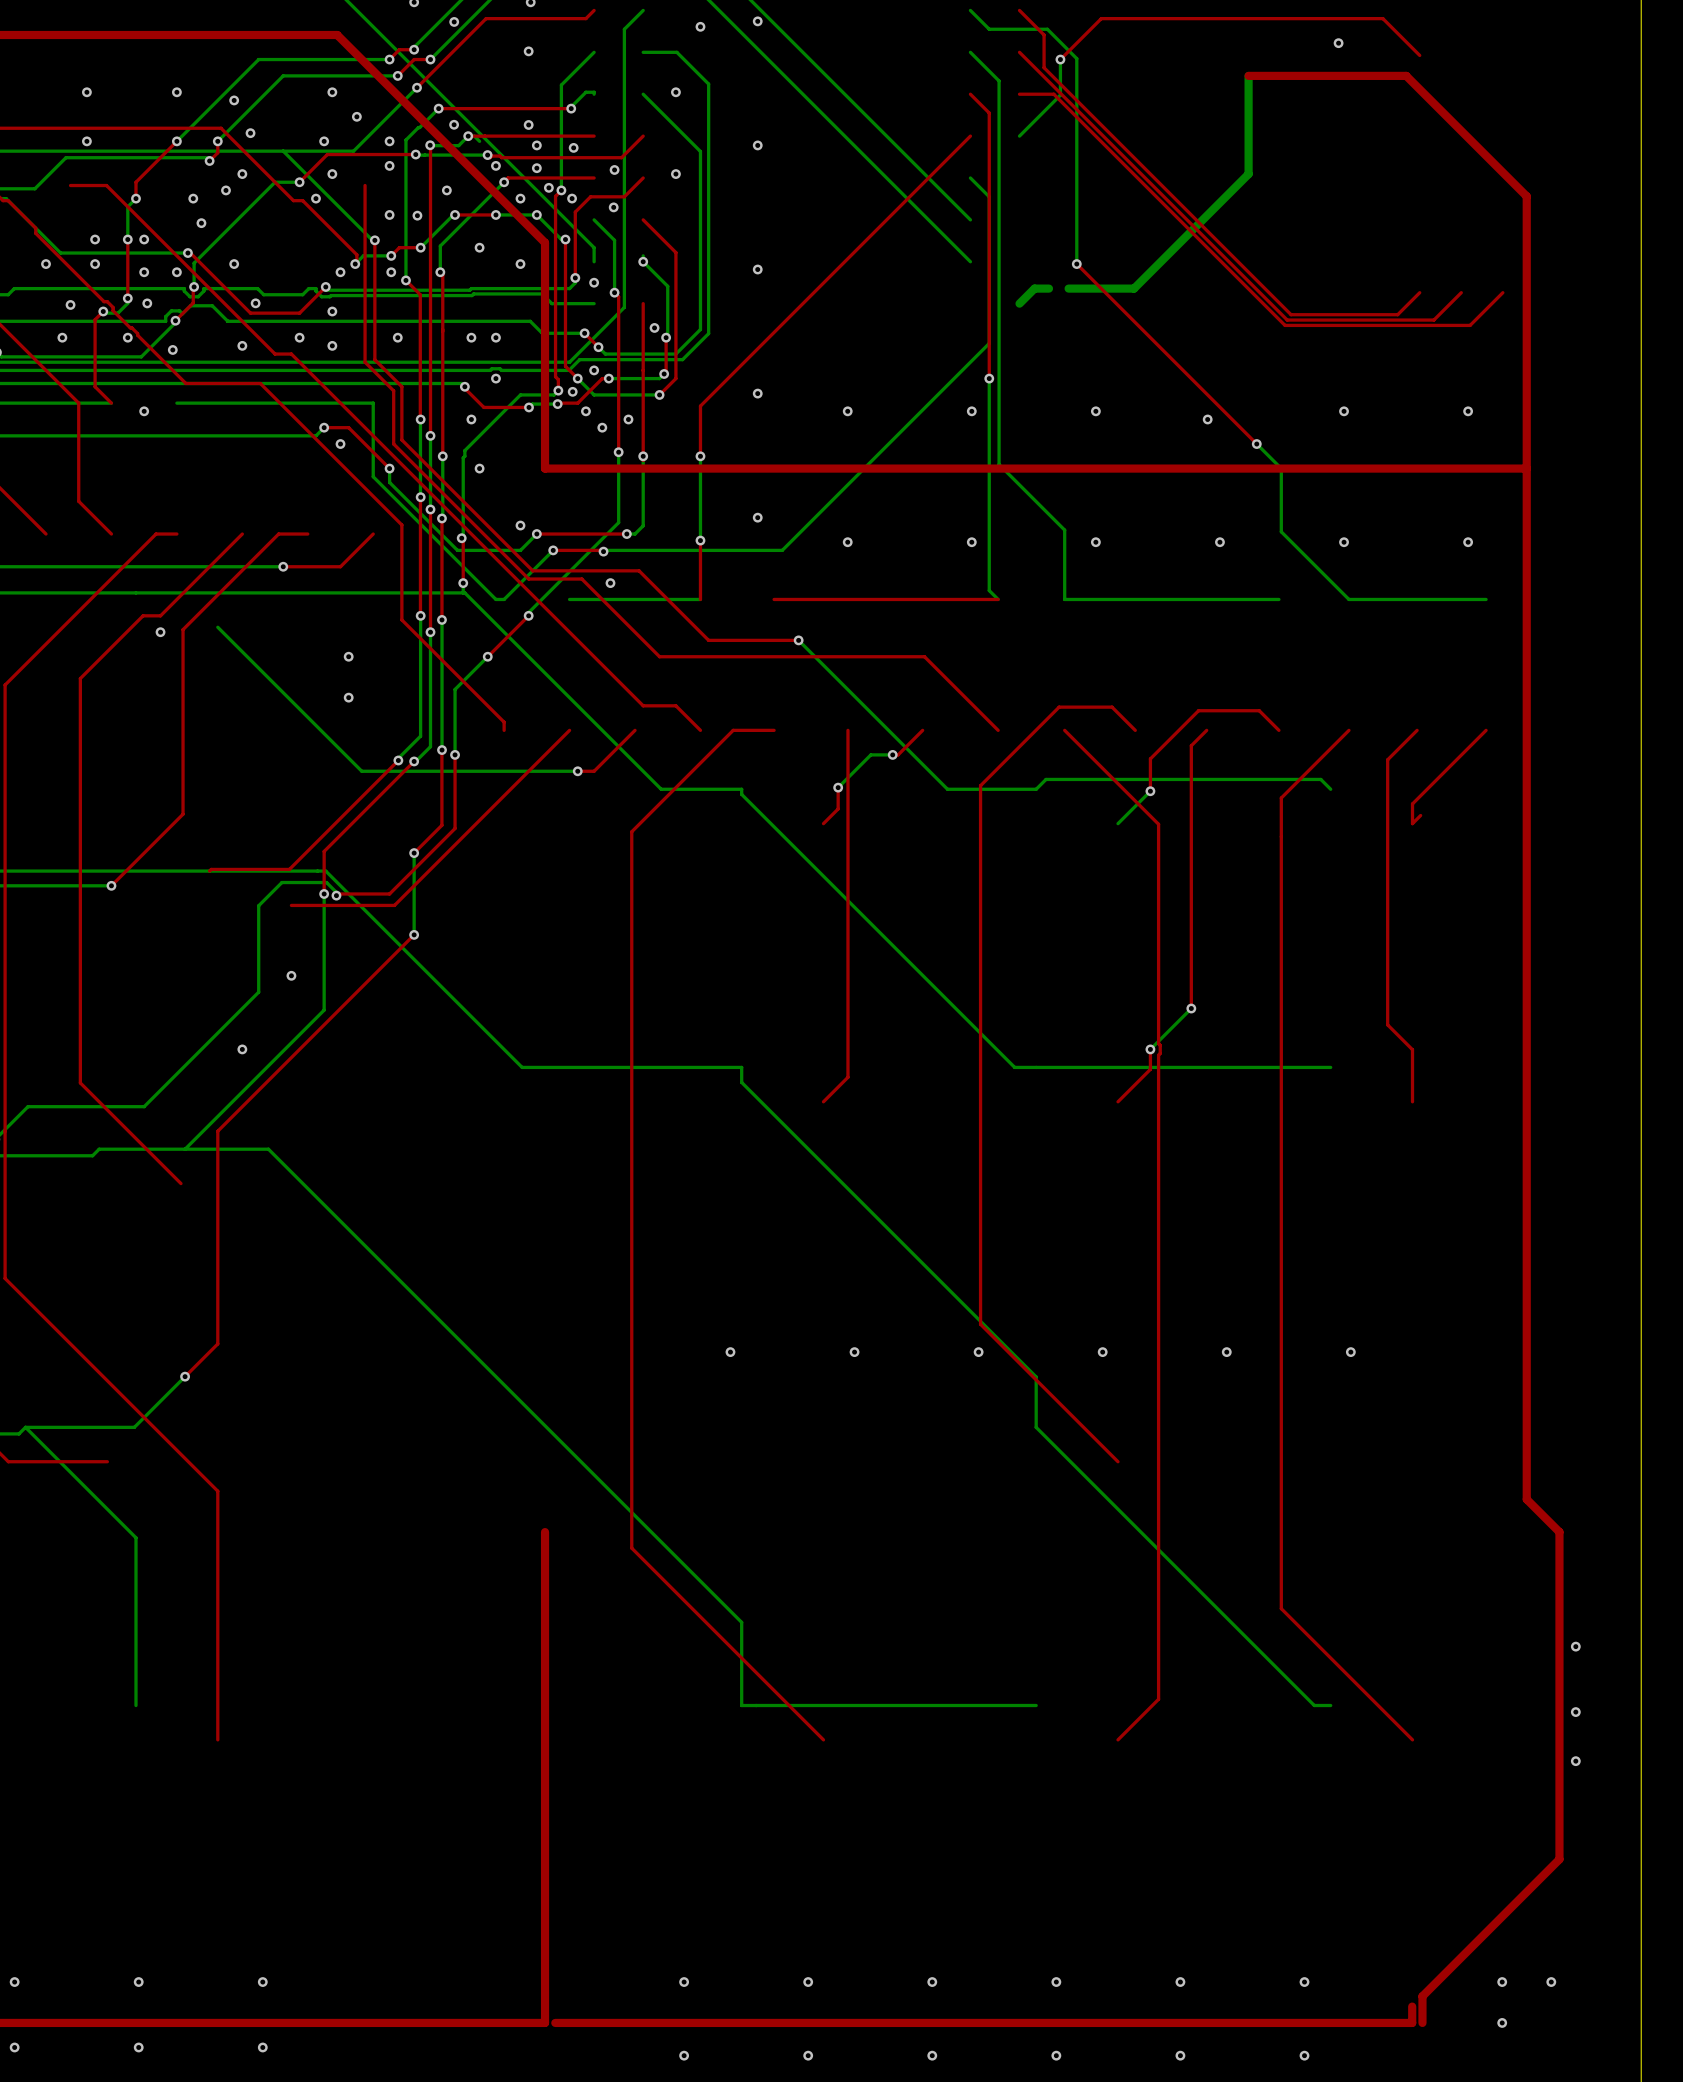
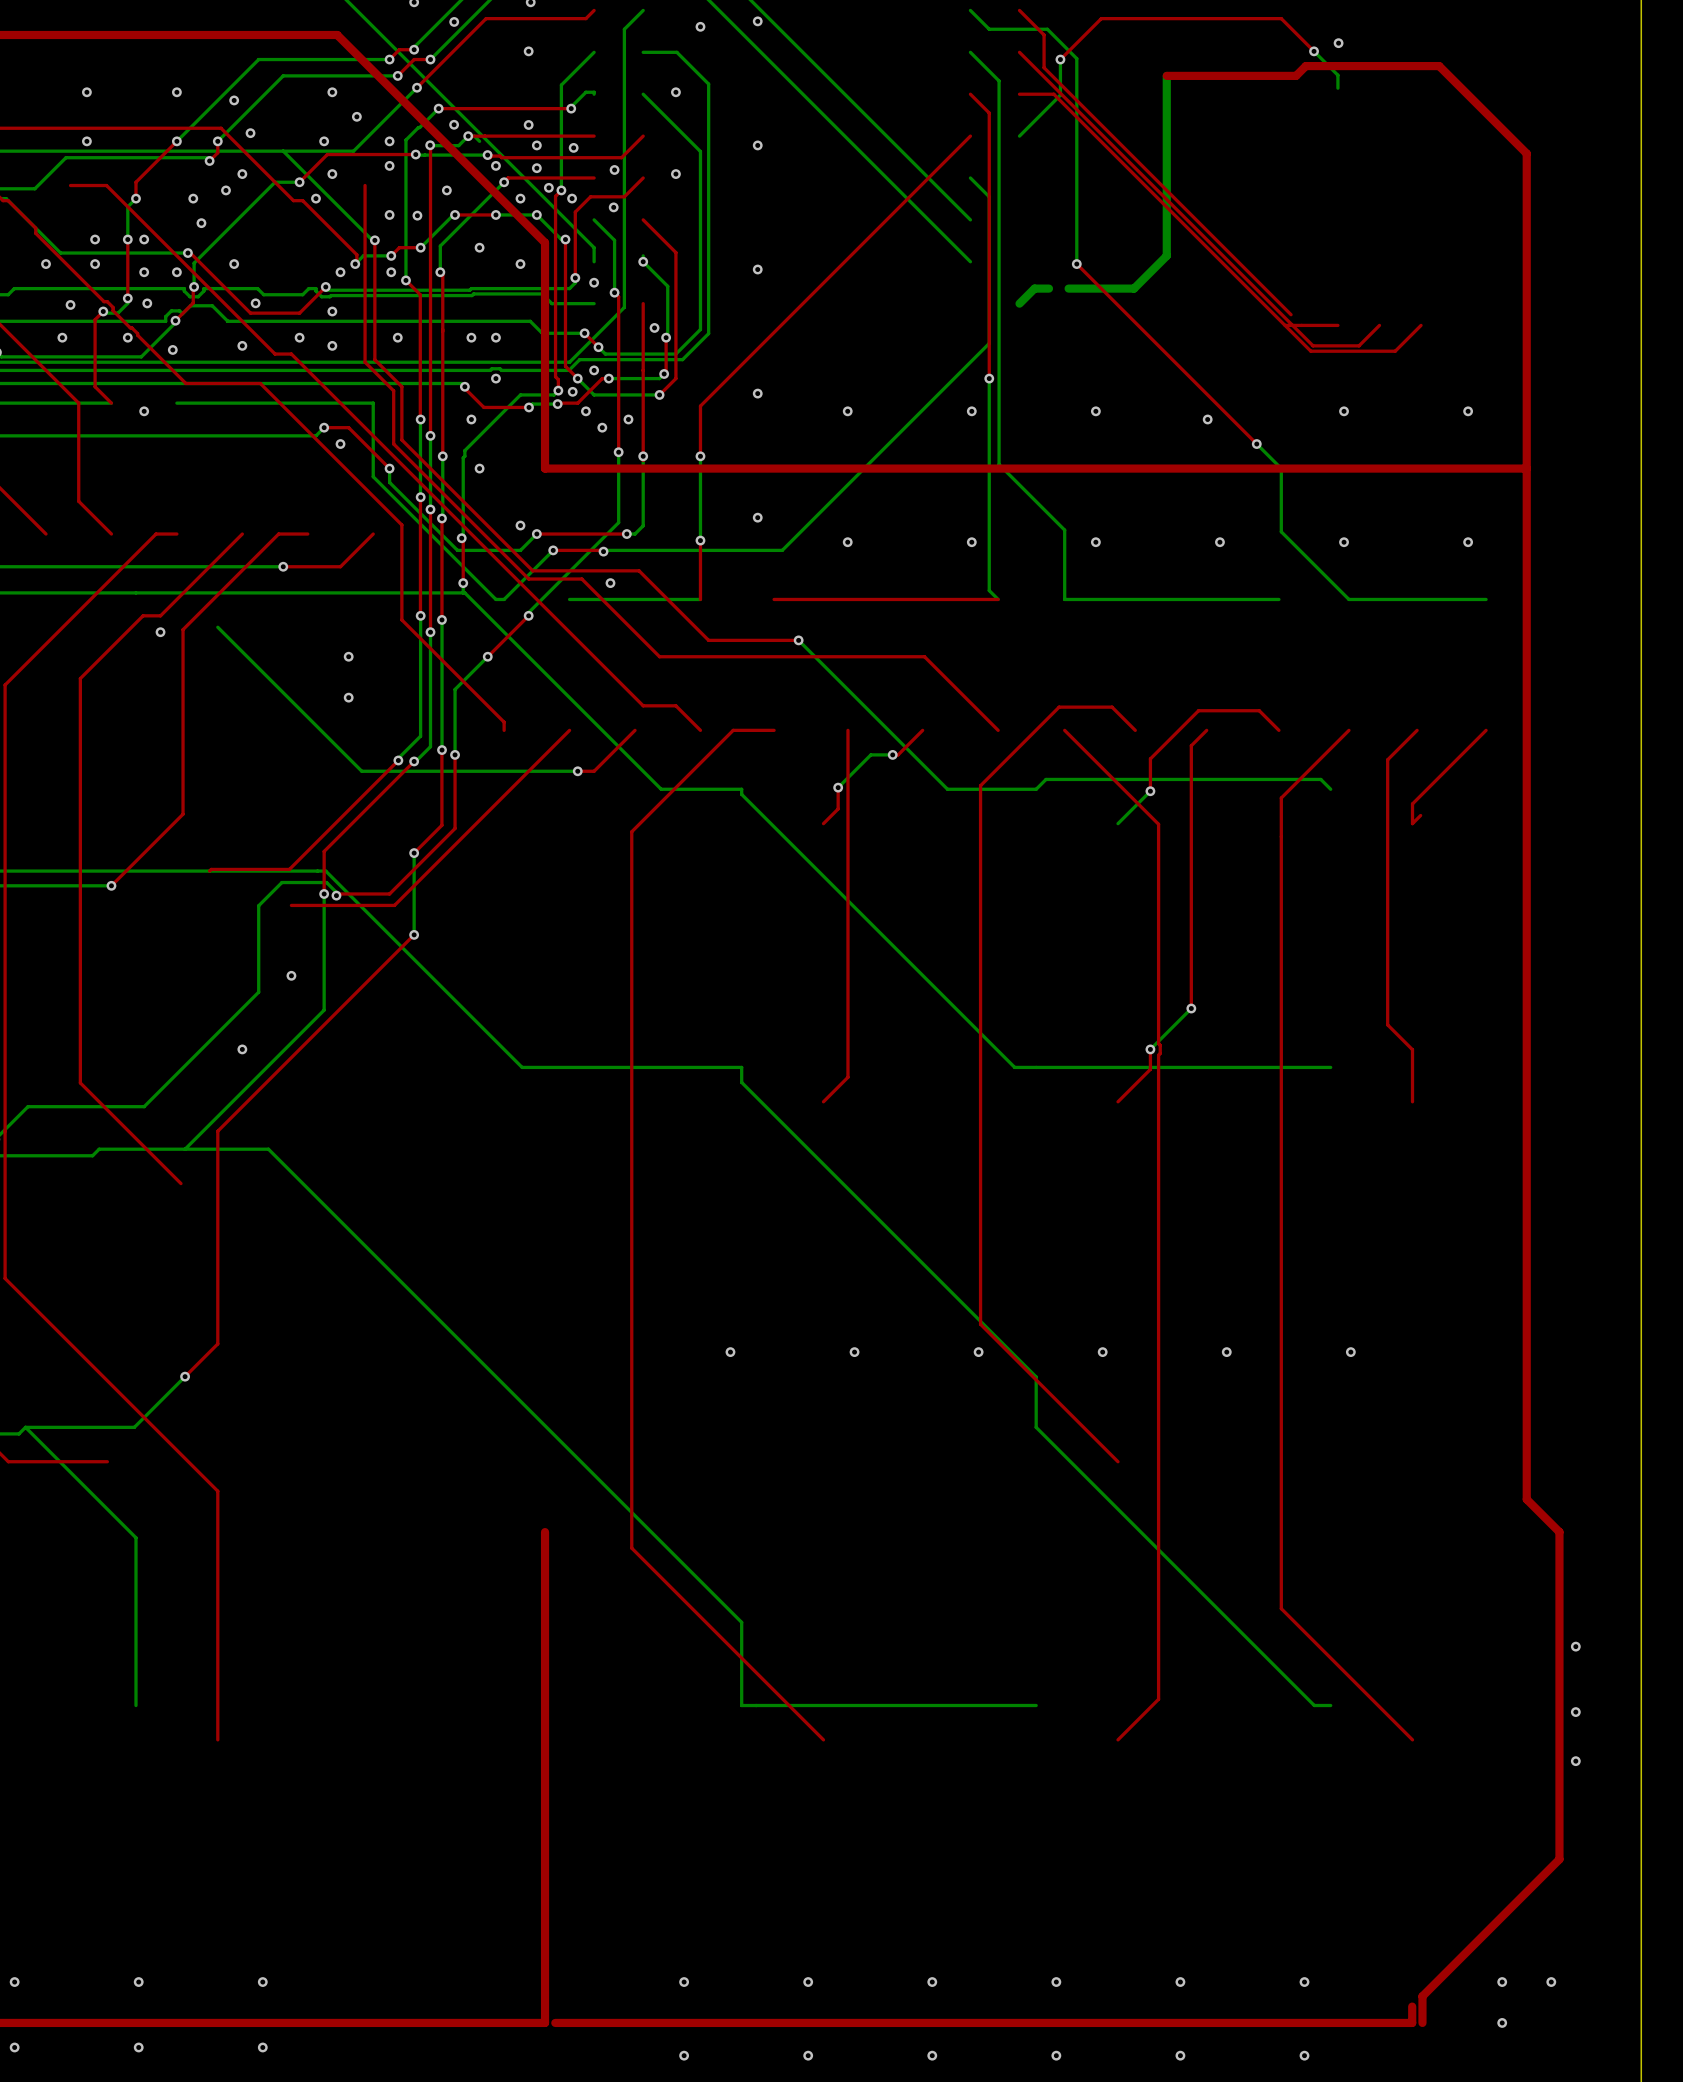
top track: (1281, 18) (1382, 18) (1419, 55) -> (1281, 18) (1314, 51)
bottom track: none -> (1314, 51) (1337, 75) (1337, 88)
via: none -> (1314, 51)
top track: none -> (1166, 75) (1248, 75)
bottom track: (1248, 75) (1248, 174) (1166, 255) -> (1166, 75) (1166, 255)
top track: (1296, 75) (1406, 75) (1526, 196) -> (1296, 75) (1305, 66) (1439, 66) (1526, 153) (1526, 196)
top track: (1419, 292) (1397, 314) (1291, 314) -> none
top track: (1461, 292) (1433, 320) (1287, 320) -> (1379, 325) (1359, 345) (1313, 345) (1287, 320)
top track: (1502, 292) (1470, 325) (1337, 325) -> none
top track: none -> (1285, 325) (1310, 351) (1395, 351) (1421, 325)

